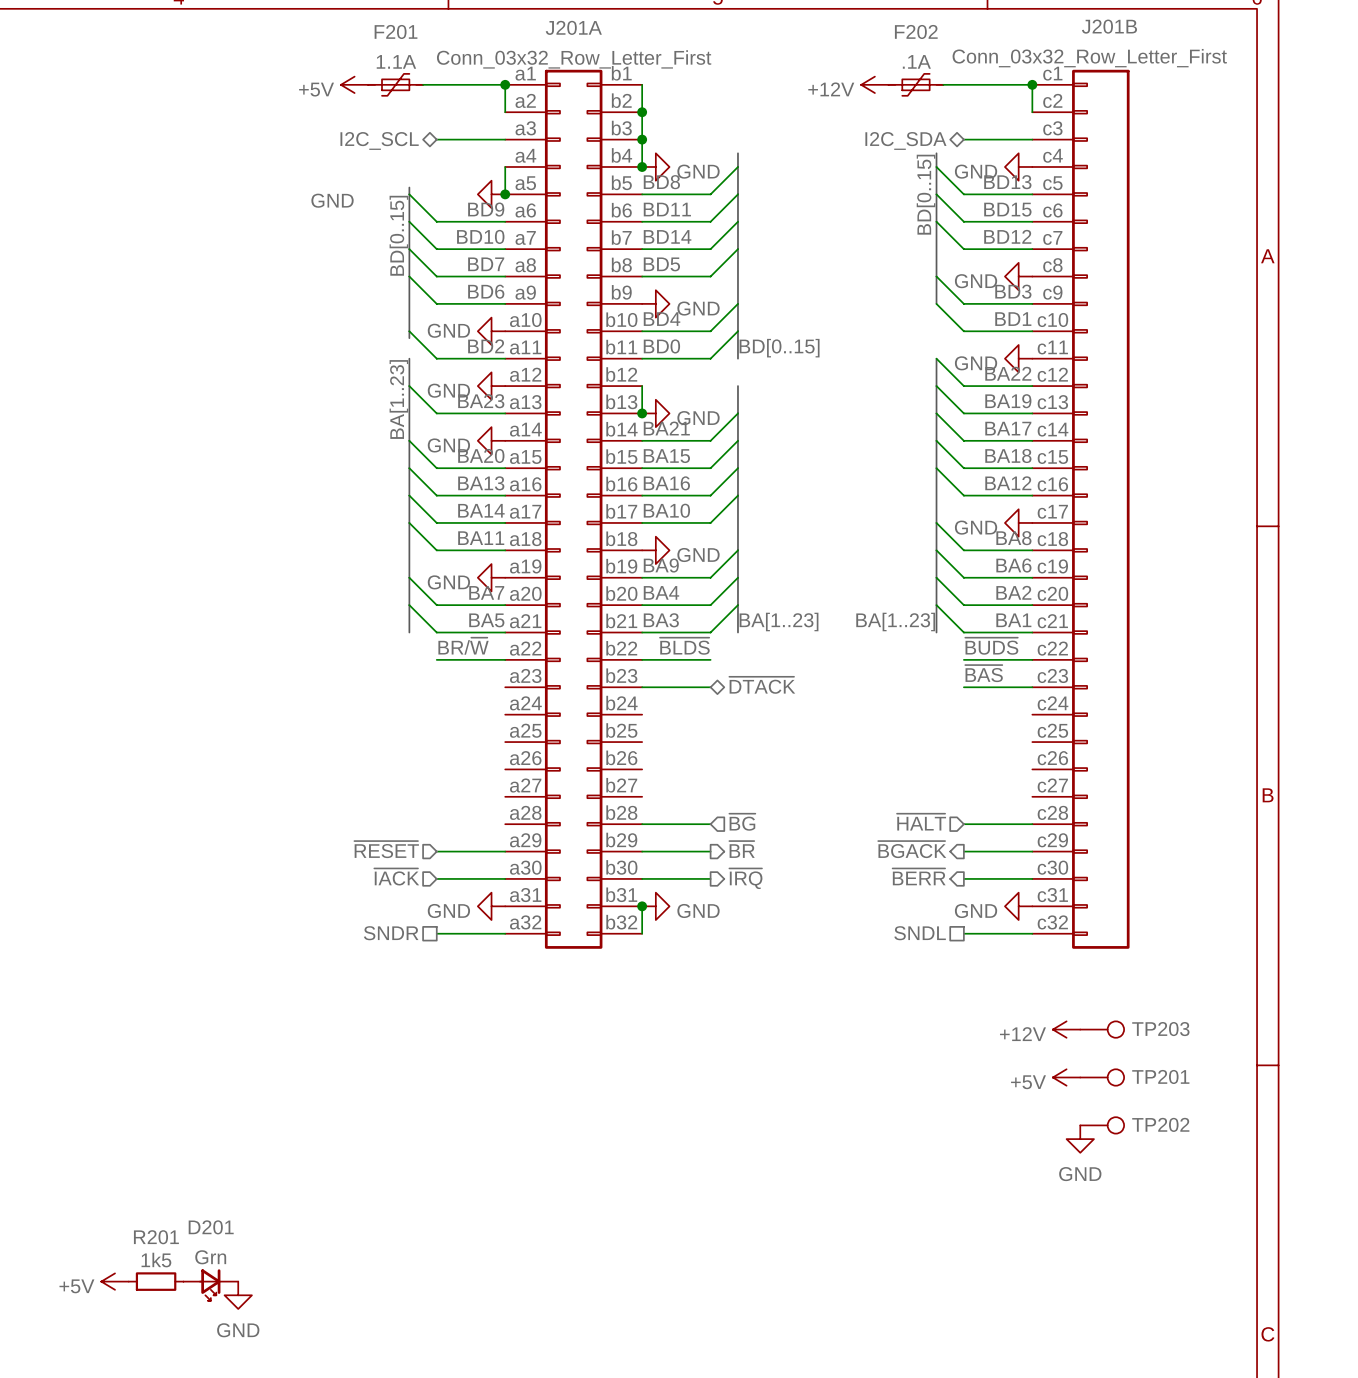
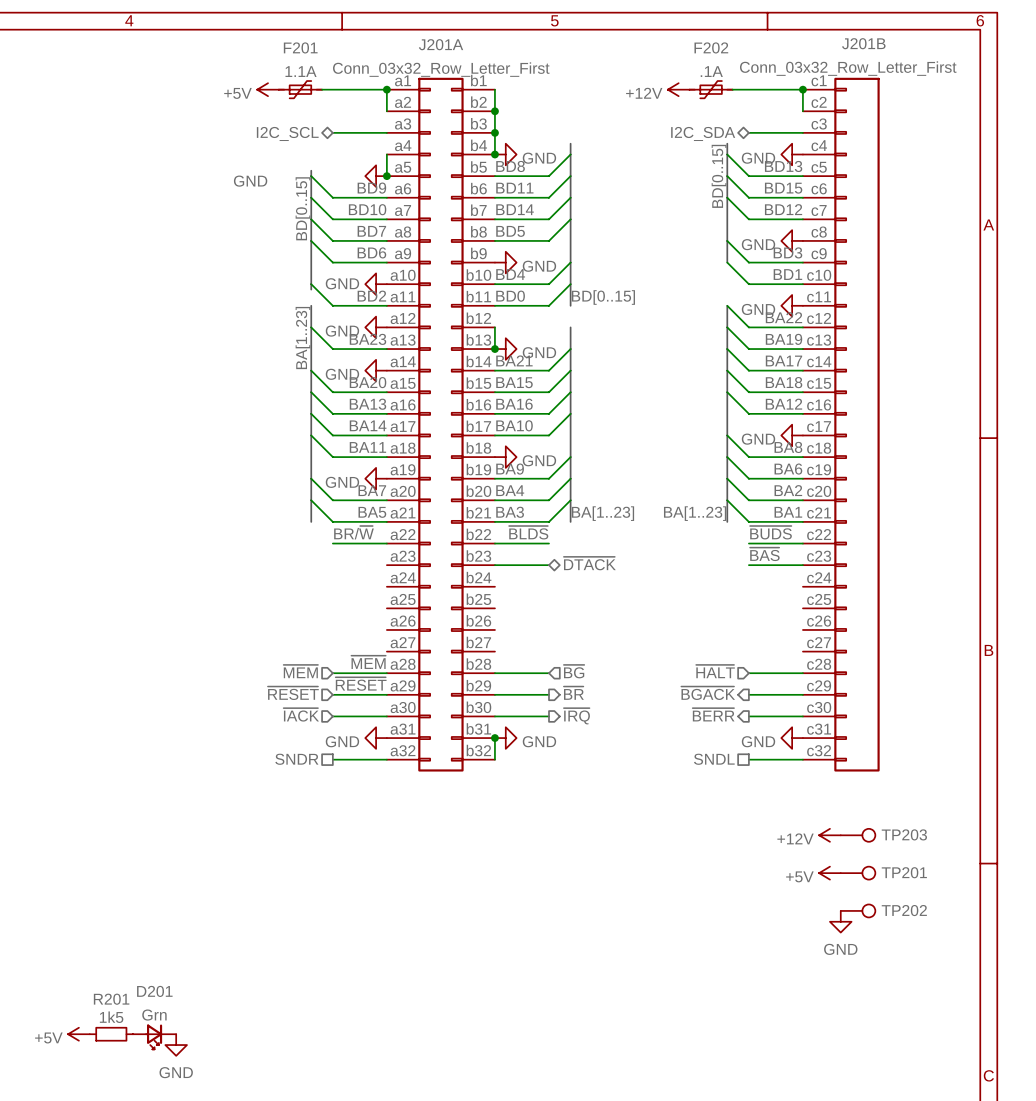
label: none -> ~{MEM} (368, 662)
hierarchical label: none -> ~{MEM} (300, 671)
wire: none -> (332, 673) (386, 673)
label: none -> ~{RESET} (361, 684)

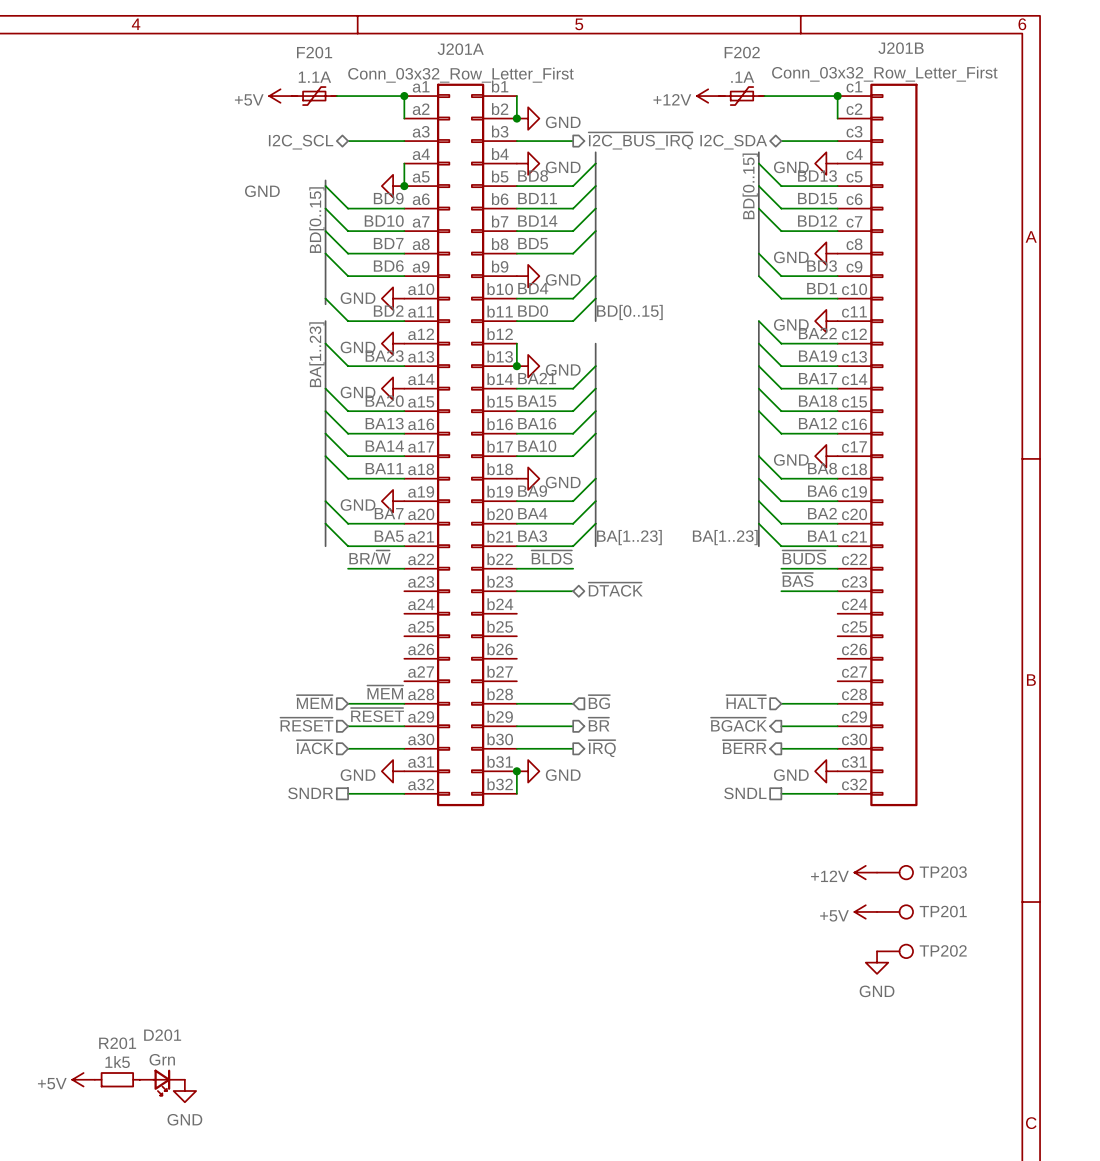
wire: (494, 111) (494, 154) -> none
power symbol: none -> GND (528, 118)
wire: none -> (516, 141) (573, 141)
junction: (494, 132) -> none
hierarchical label: none -> ~{I2C_BUS_IRQ} (640, 140)
junction: (494, 154) -> none

